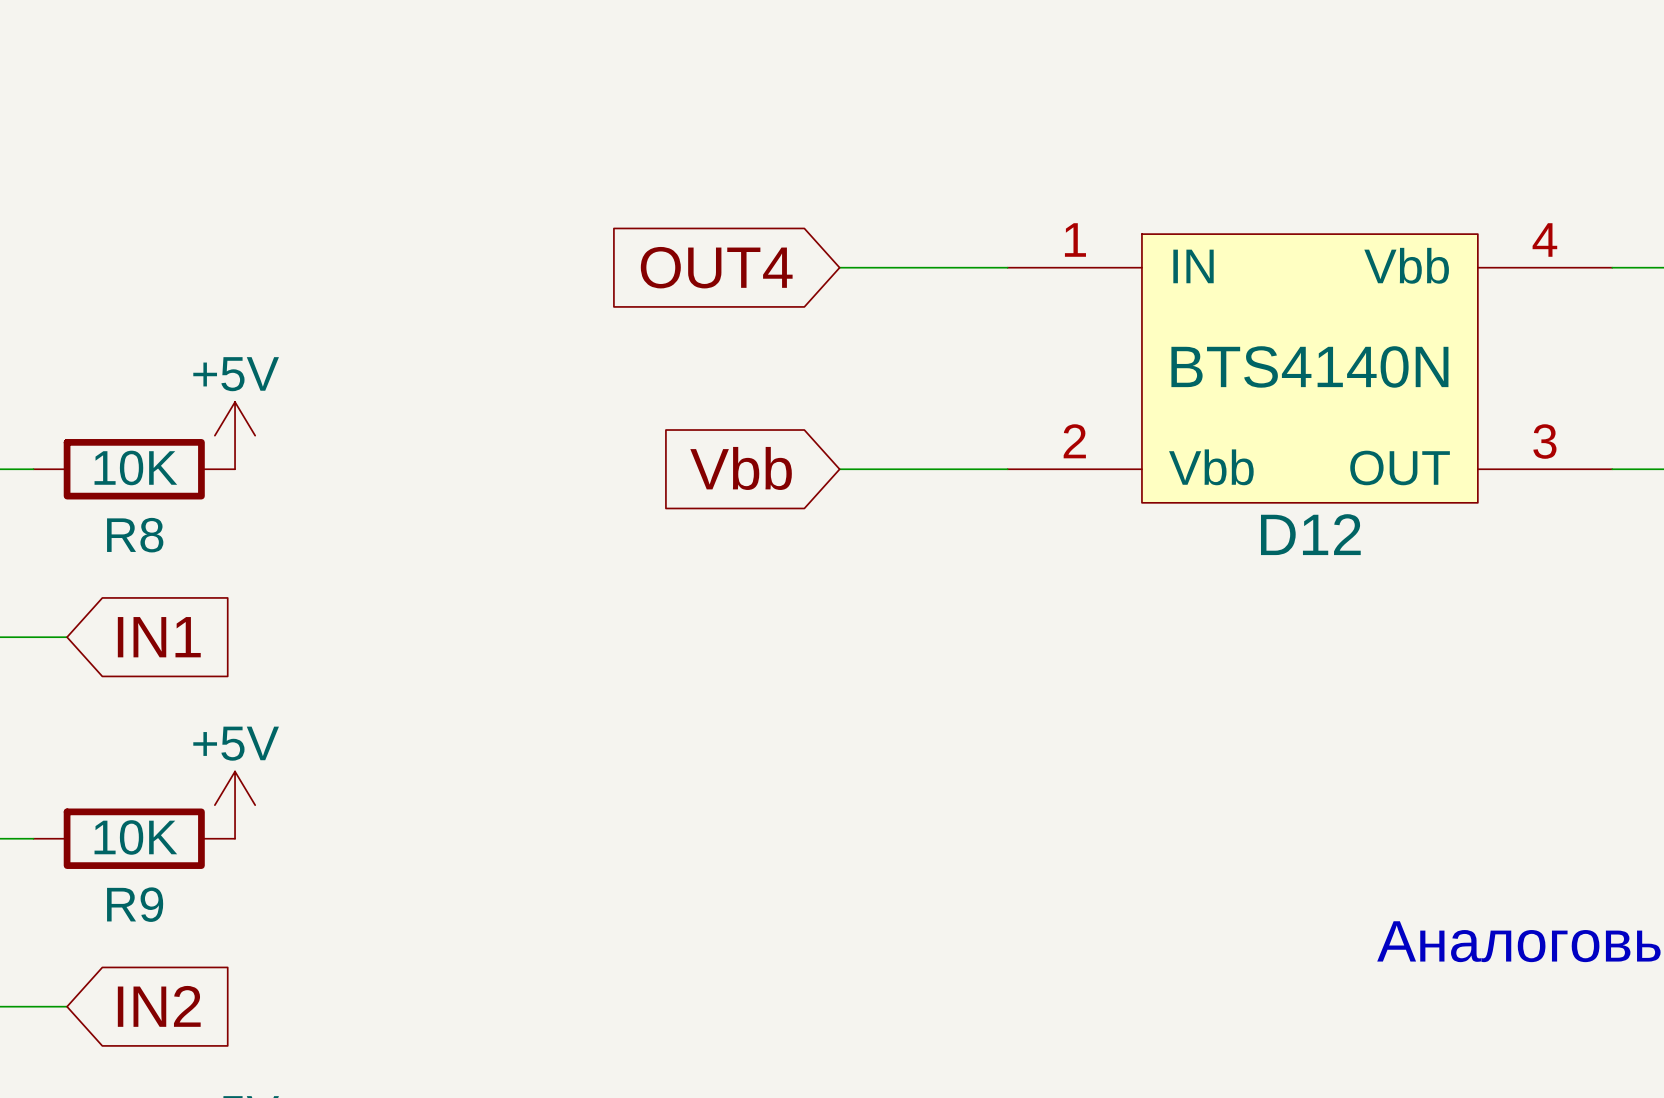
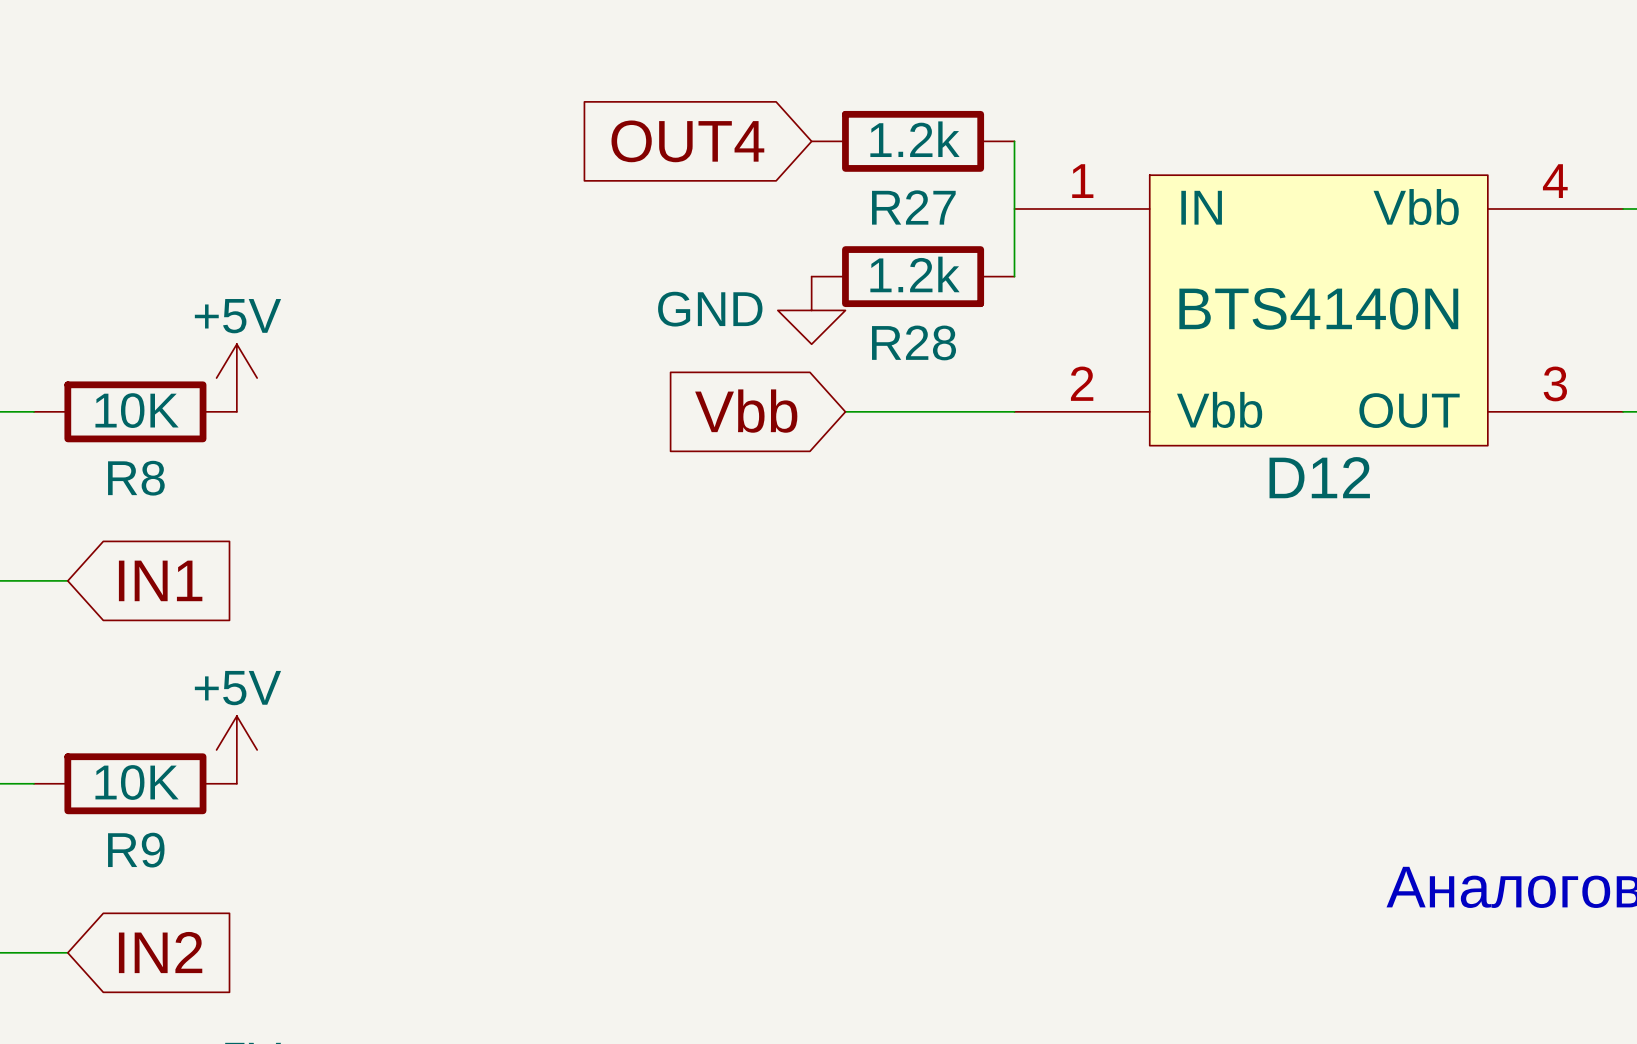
R27: none -> 1.2k (913, 141)
wire: none -> (1014, 141) (1014, 276)
global label position: OUT4 (716, 267) -> OUT4 (687, 141)
wire: (839, 267) (1007, 267) -> none
R28: none -> 1.2k (913, 276)
power symbol: none -> GND (811, 310)

